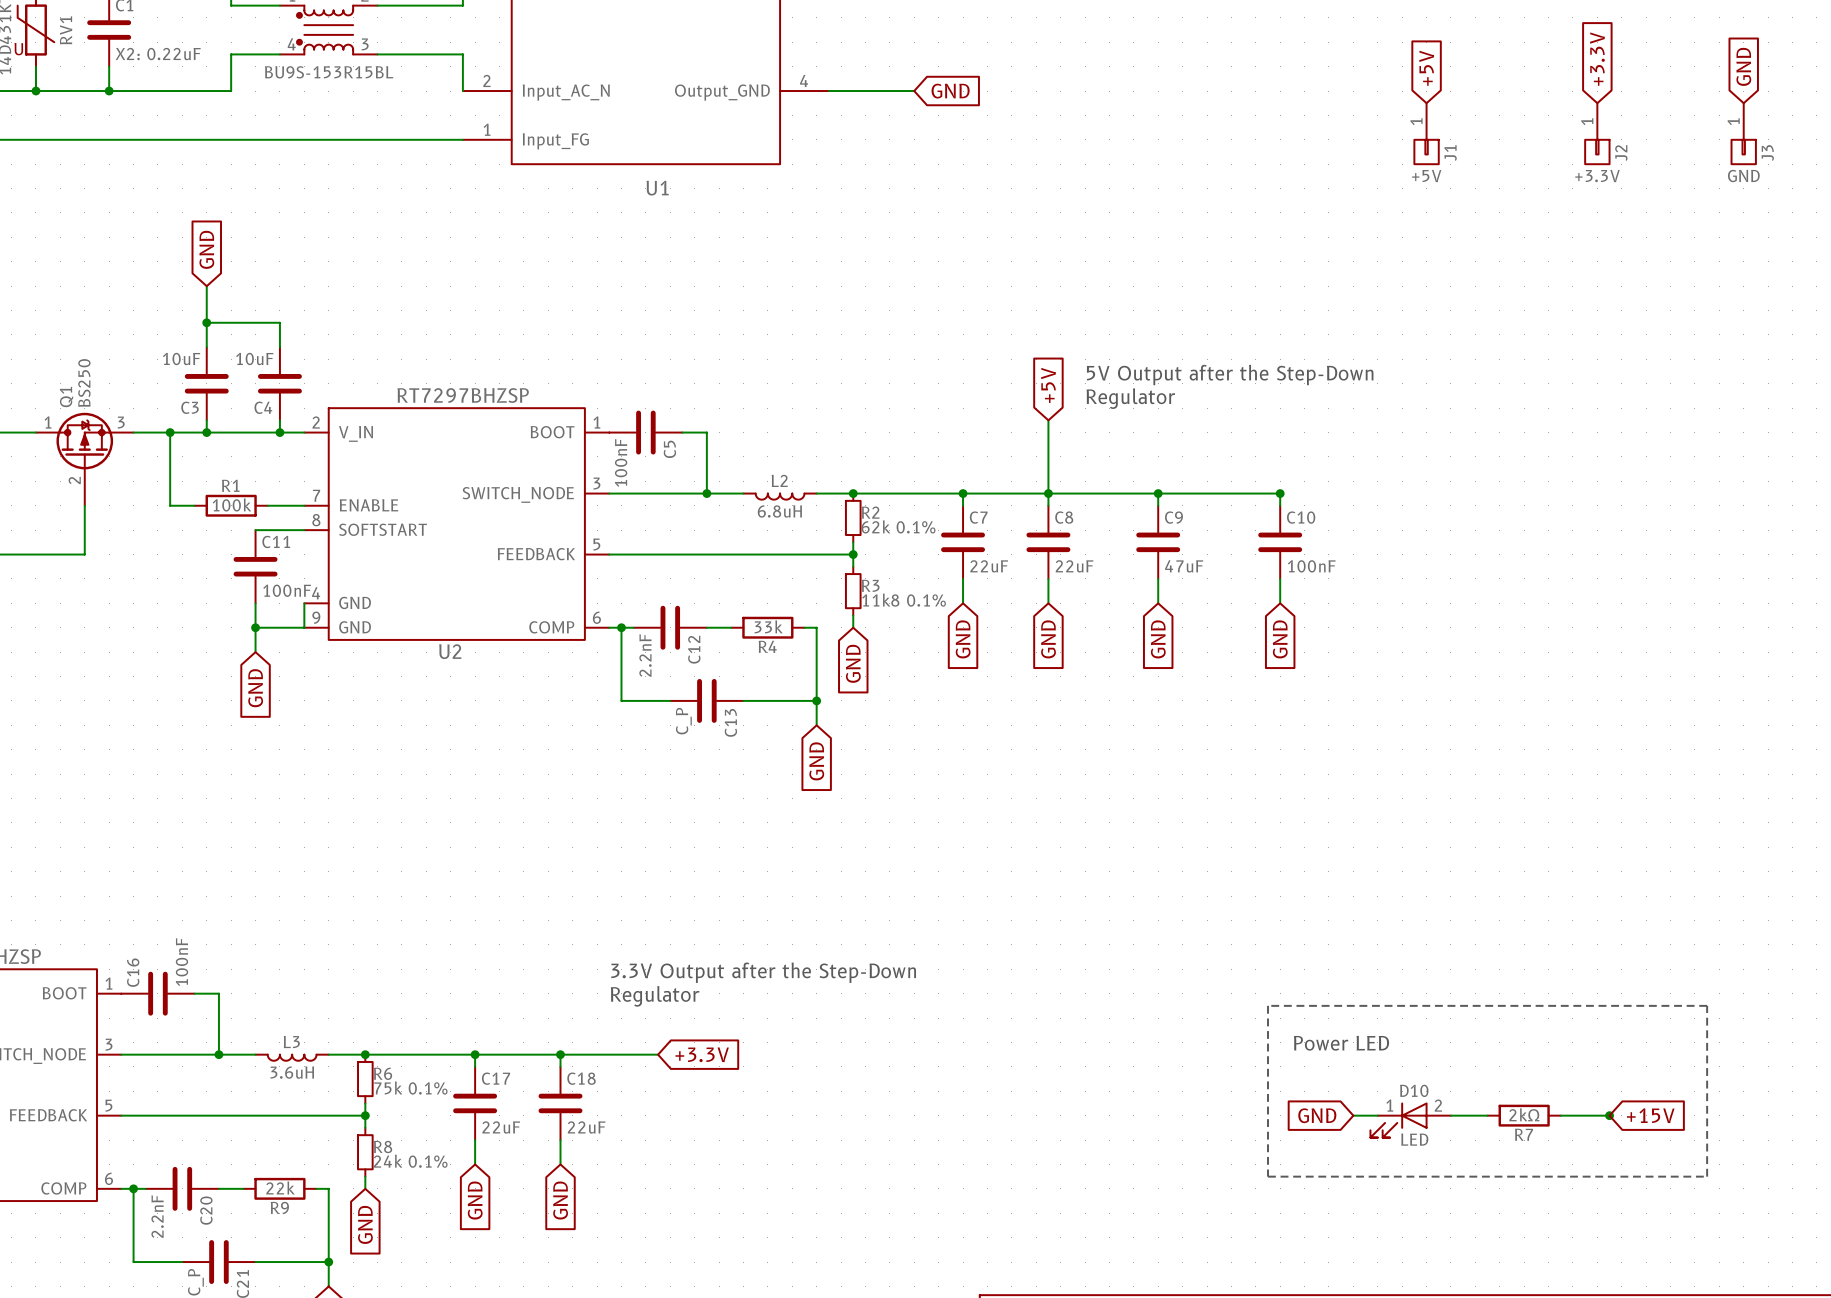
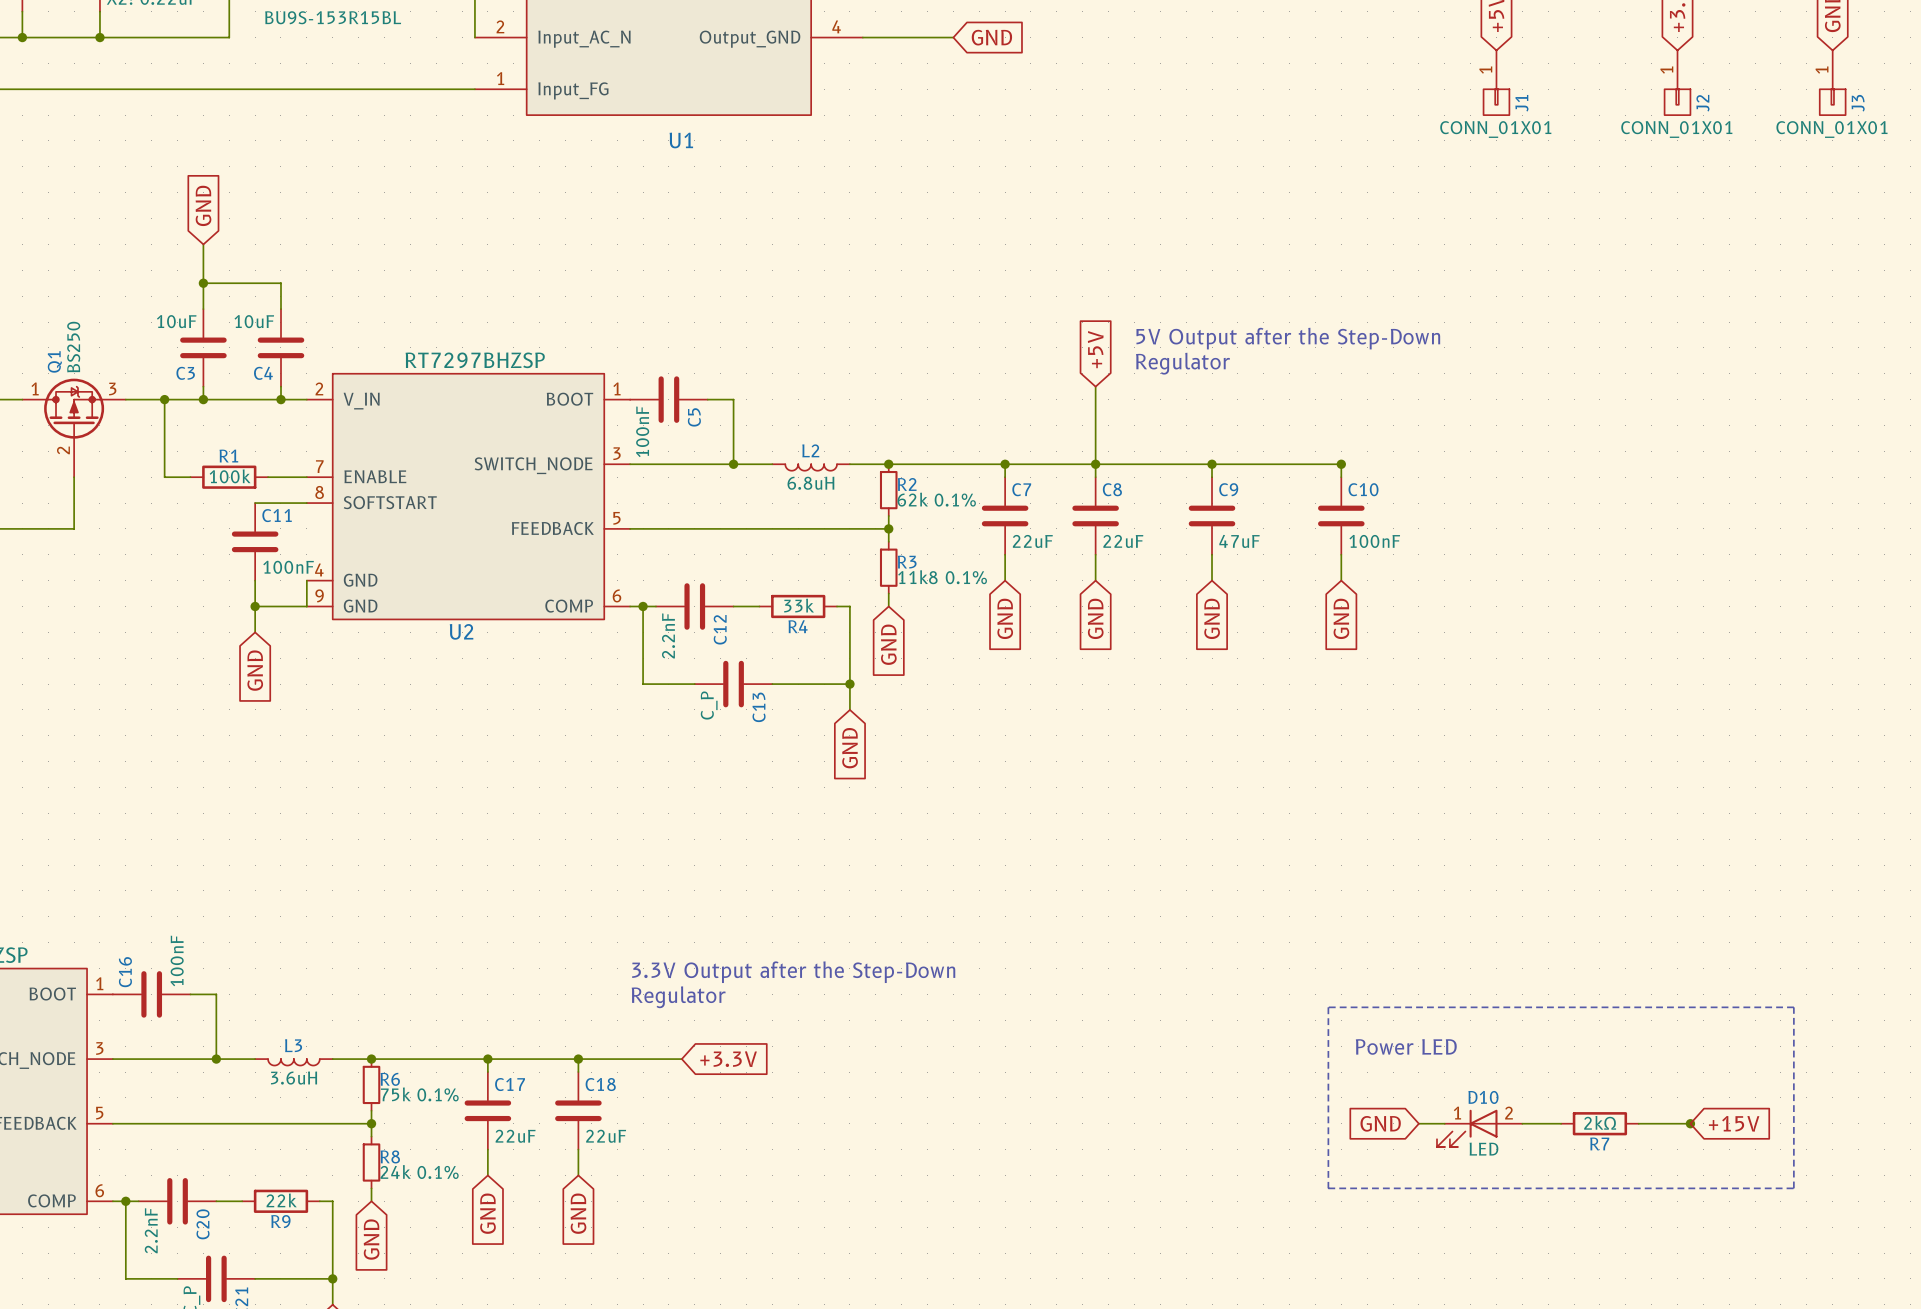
J1 value: +5V (1426, 176) -> CONN_01X01 (1495, 129)
J2 value: +3.3V (1597, 176) -> CONN_01X01 (1676, 129)
J3 value: GND (1743, 176) -> CONN_01X01 (1831, 129)

